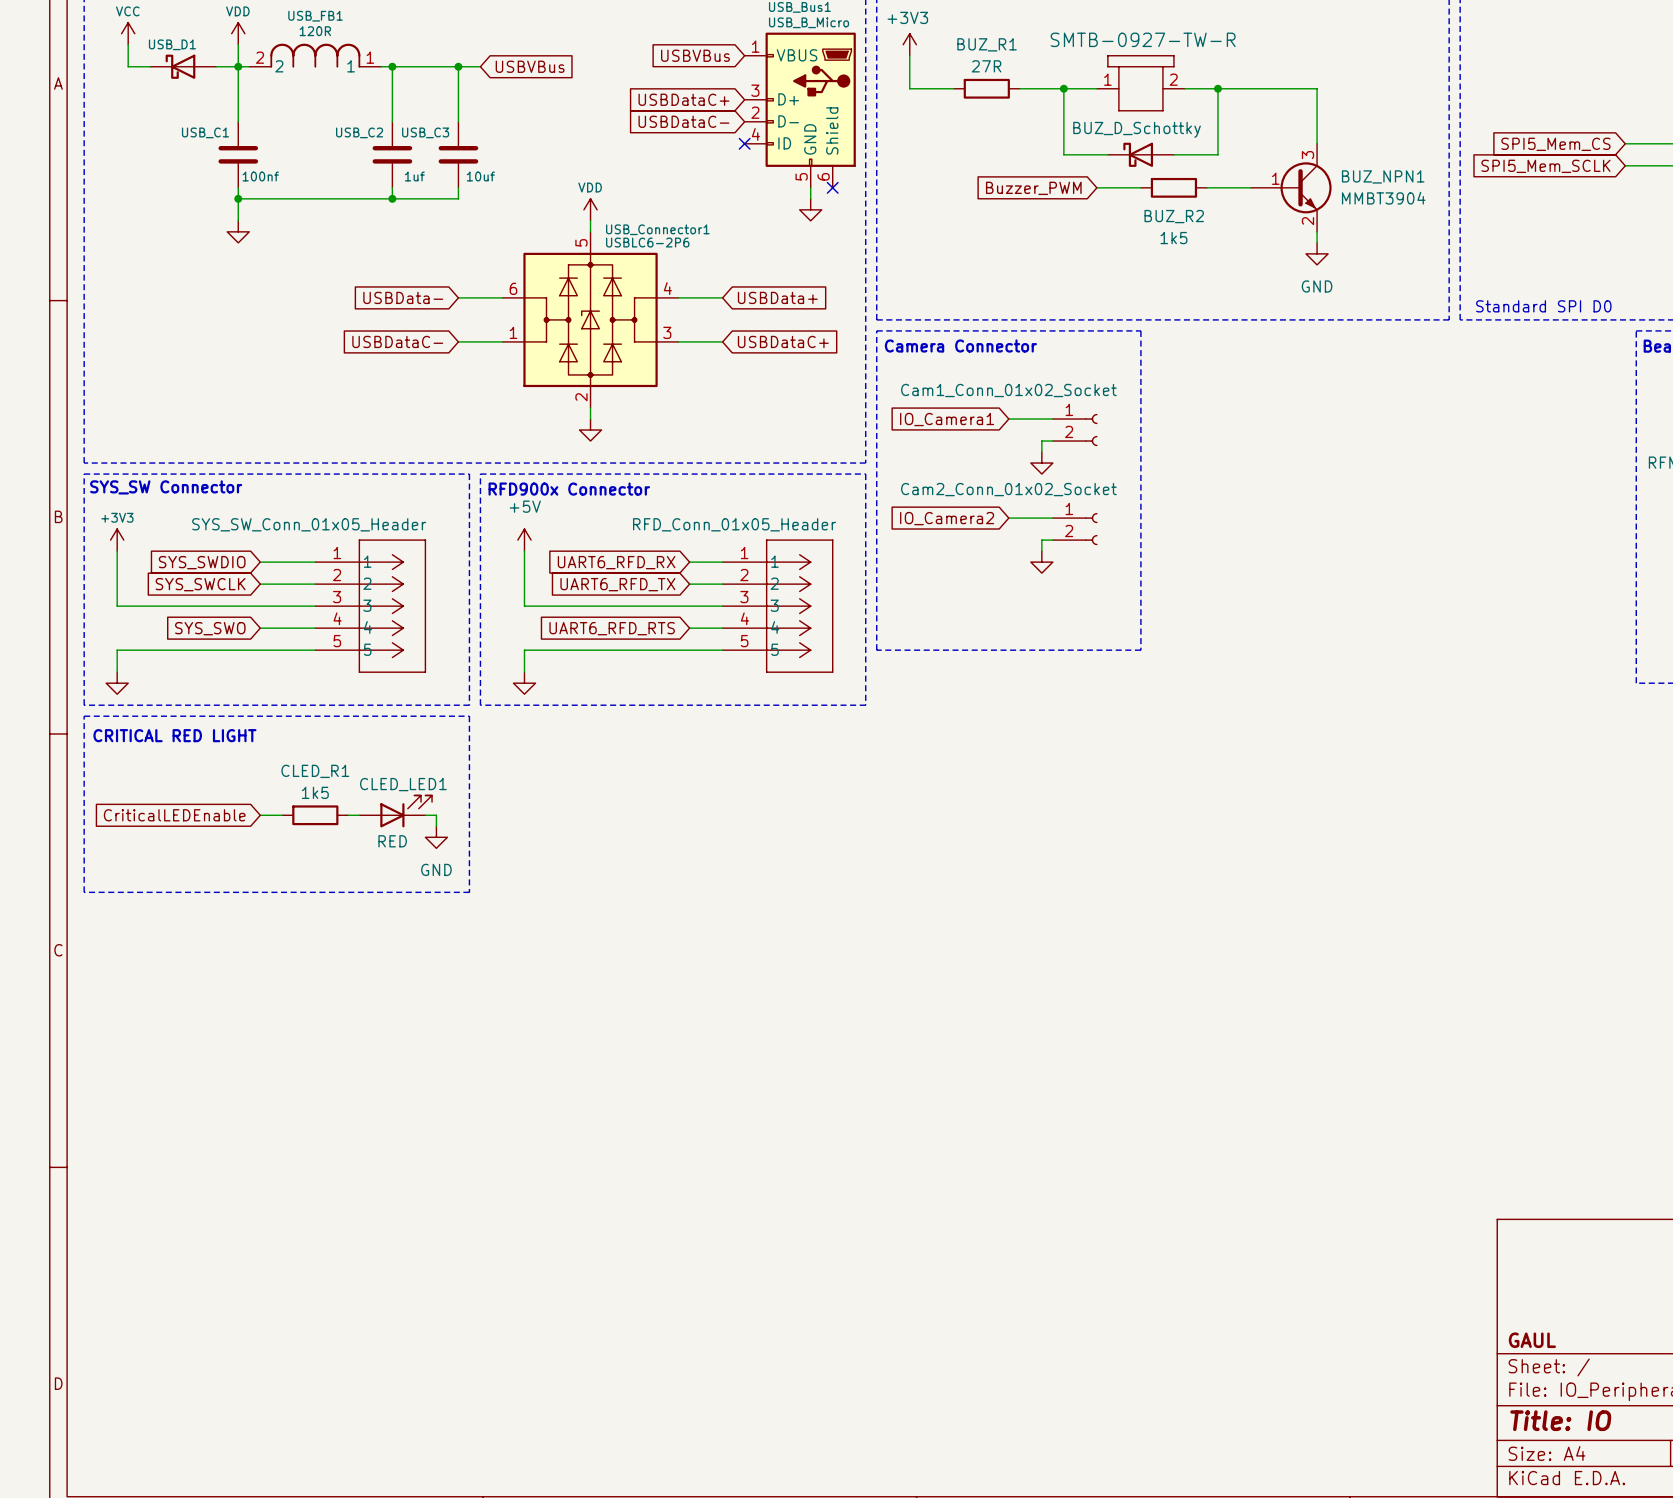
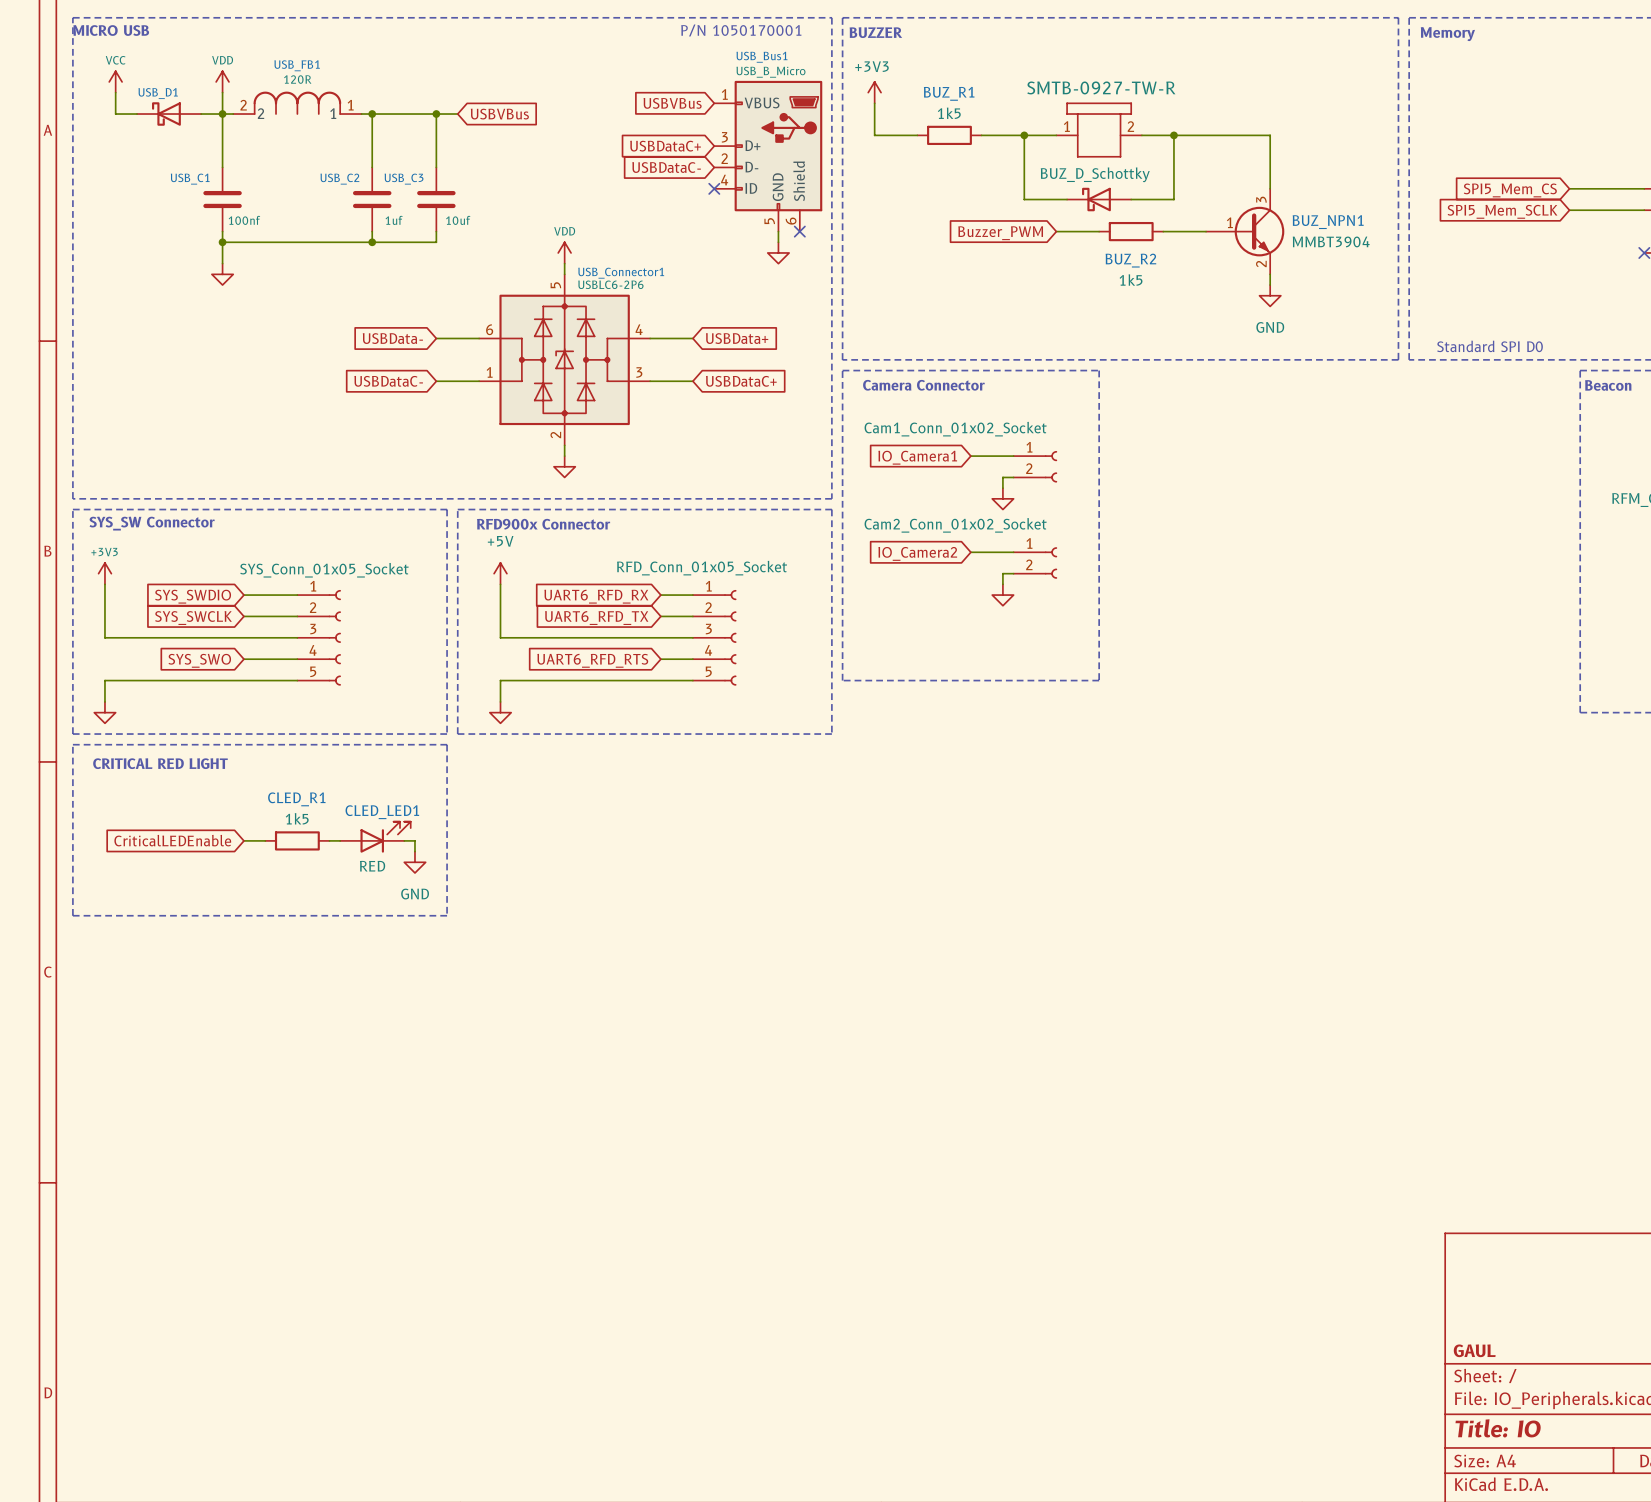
BUZ_R1 value: 27R (986, 66) -> 1k5 (949, 113)
part: none -> SYS_Conn_01x05_Socket (319, 637)
part: SYS_SW_Conn_01x05_Header (370, 606) -> none
part: none -> RFD_Conn_01x05_Socket (714, 637)
part: RFD_Conn_01x05_Header (777, 606) -> none

